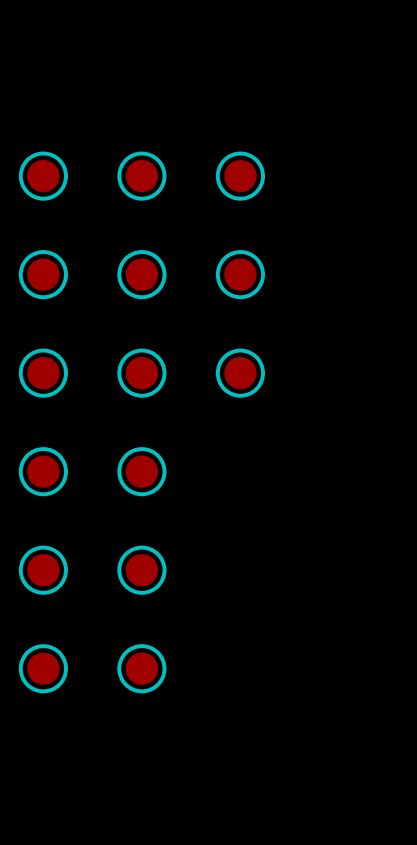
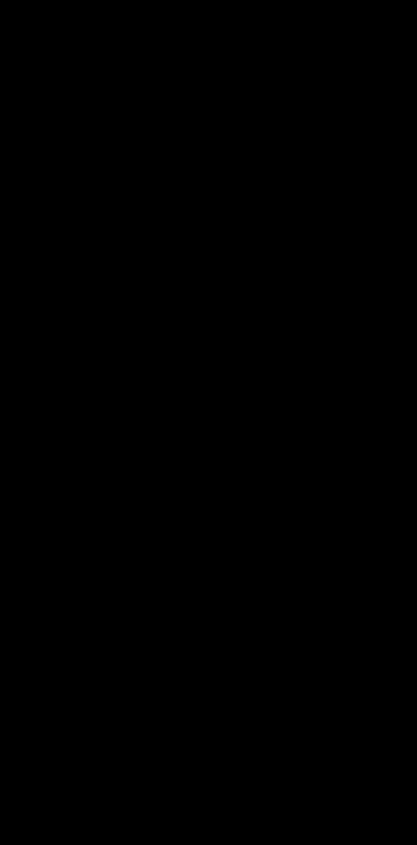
part: (43, 176) -> none
part: (141, 176) -> none
part: (240, 176) -> none
part: (43, 274) -> none
part: (141, 274) -> none
part: (240, 274) -> none
part: (43, 373) -> none
part: (141, 373) -> none
part: (240, 373) -> none
part: (43, 471) -> none
part: (141, 471) -> none
part: (43, 570) -> none
part: (141, 570) -> none
part: (43, 668) -> none
part: (141, 668) -> none

